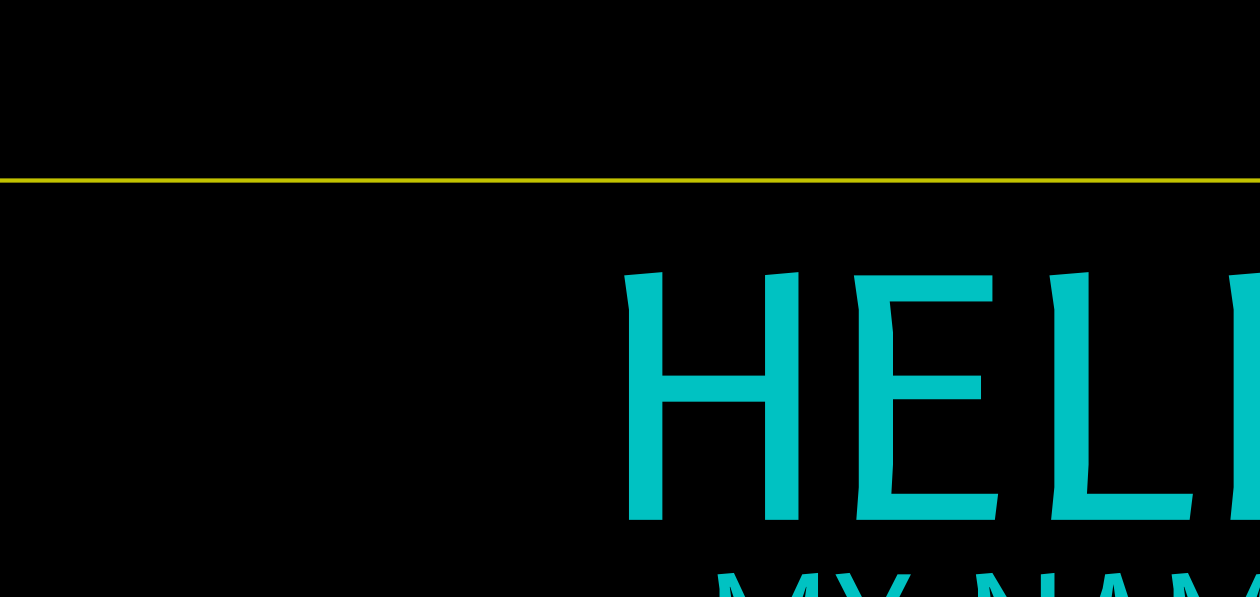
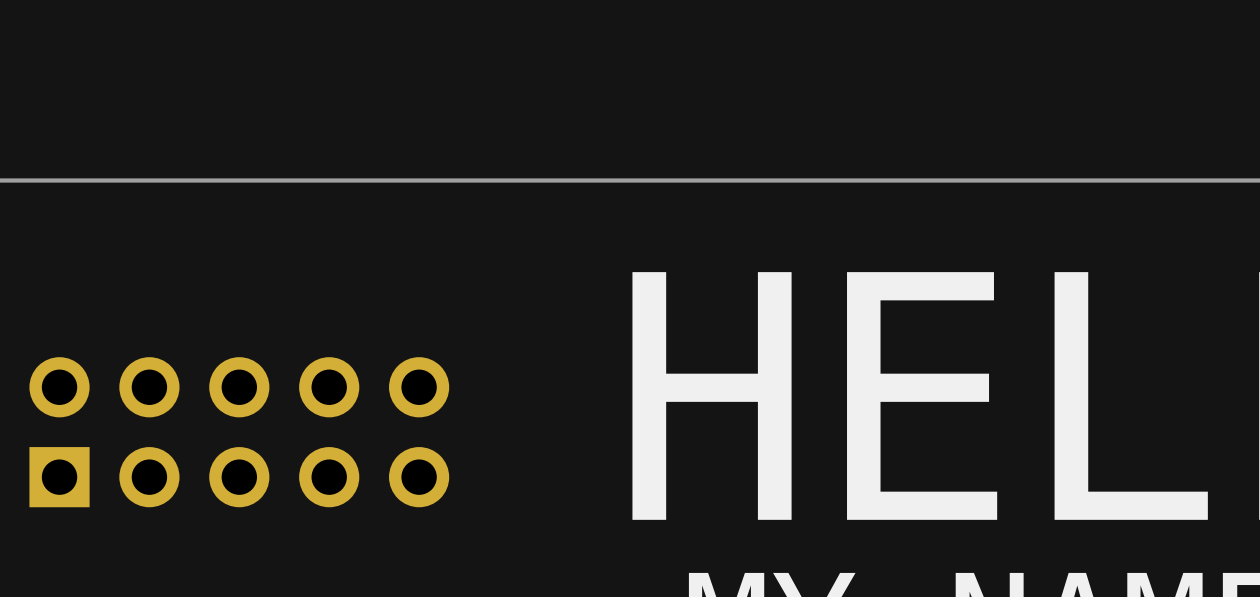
part: none -> (239, 432)

